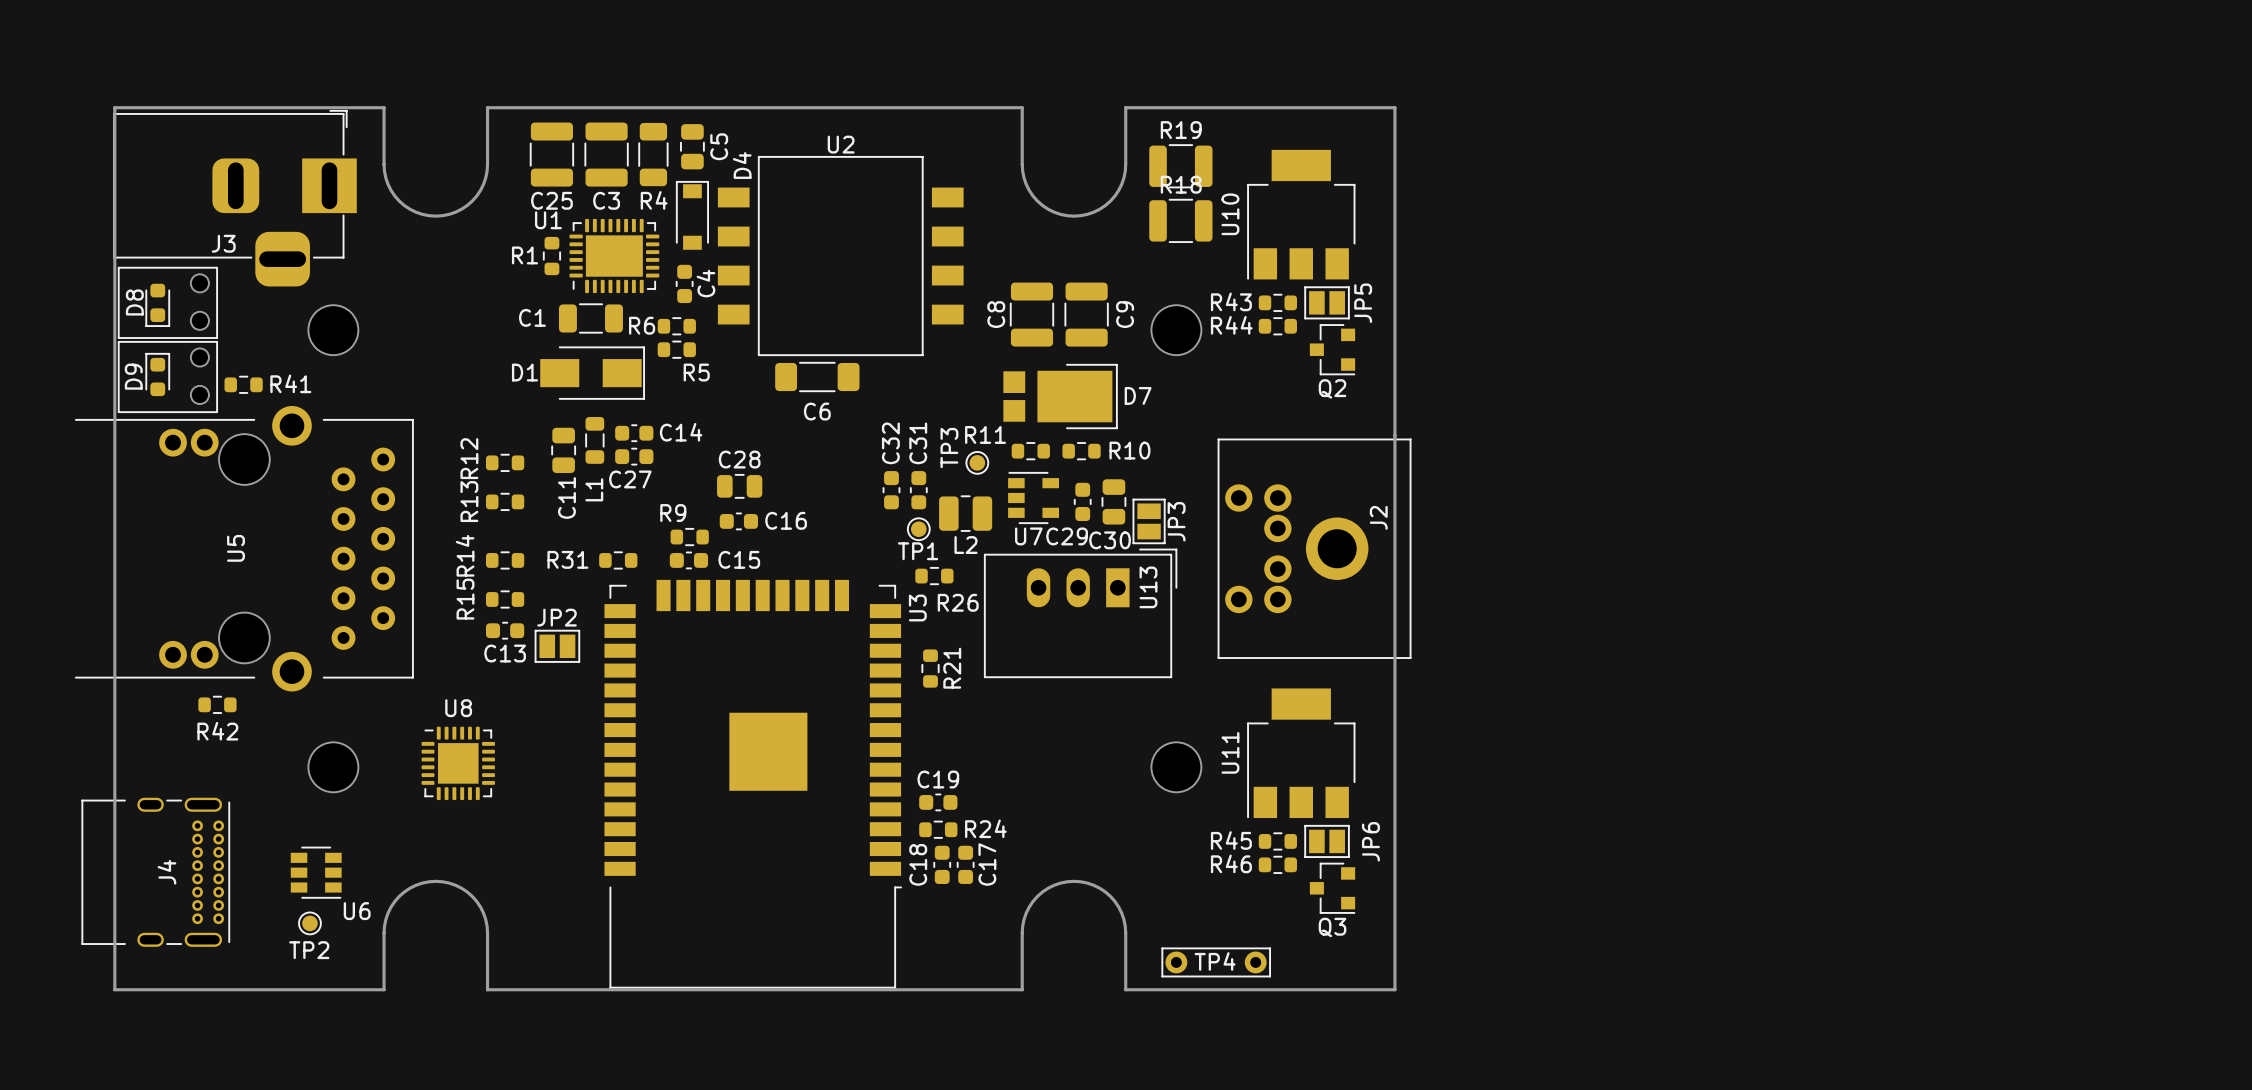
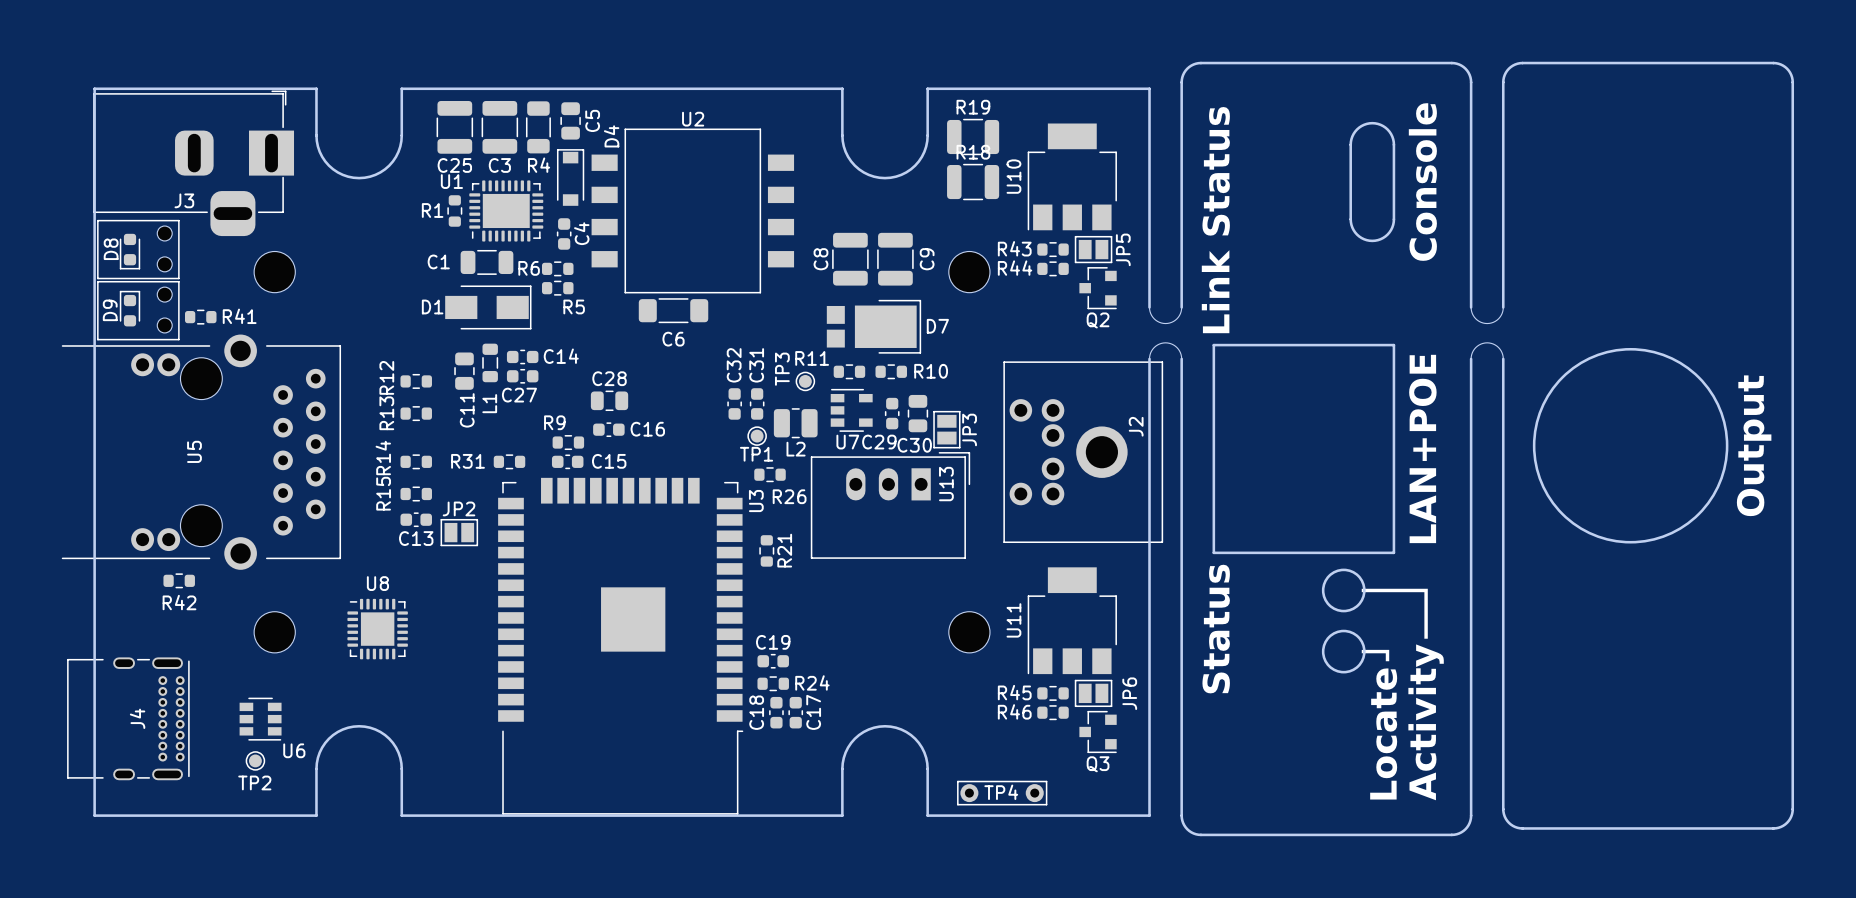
drawing: none -> [1201, 103, 1444, 801]
board edge: none -> (1350, 144) (1351, 224) (1355, 232) (1361, 237) (1369, 240) (1377, 240) (1387, 234) (1393, 222) (1393, 139) (1385, 127) (1377, 123) (1369, 123) (1357, 129) (1352, 136) (1350, 144)
board edge: (1394, 373) (1394, 435) -> (1149, 307) (1152, 317) (1163, 323) (1175, 320) (1181, 309) (1181, 82) (1185, 70) (1193, 64) (1451, 63) (1465, 68) (1471, 82) (1471, 309) (1475, 318) (1487, 323) (1498, 318) (1503, 309) (1503, 82) (1504, 74) (1510, 67) (1522, 63) (1773, 63) (1785, 67) (1791, 74) (1792, 82) (1792, 809) (1788, 820) (1780, 827) (1773, 828) (1522, 828) (1512, 825) (1505, 818) (1503, 809) (1503, 358) (1498, 347) (1487, 342) (1475, 347) (1471, 358) (1471, 815) (1468, 825) (1461, 832) (1451, 834) (1200, 834) (1189, 830) (1183, 822) (1181, 815) (1181, 356) (1175, 346) (1163, 342) (1154, 347) (1149, 358)
board edge: none -> (1213, 345) (1213, 552) (1393, 552) (1393, 345) (1213, 345)
round board edge: none -> [1532, 347, 1729, 544]
drawing: none -> [1736, 375, 1772, 517]
round board edge: none -> [1321, 568, 1366, 613]
round board edge: none -> [1321, 629, 1366, 674]

